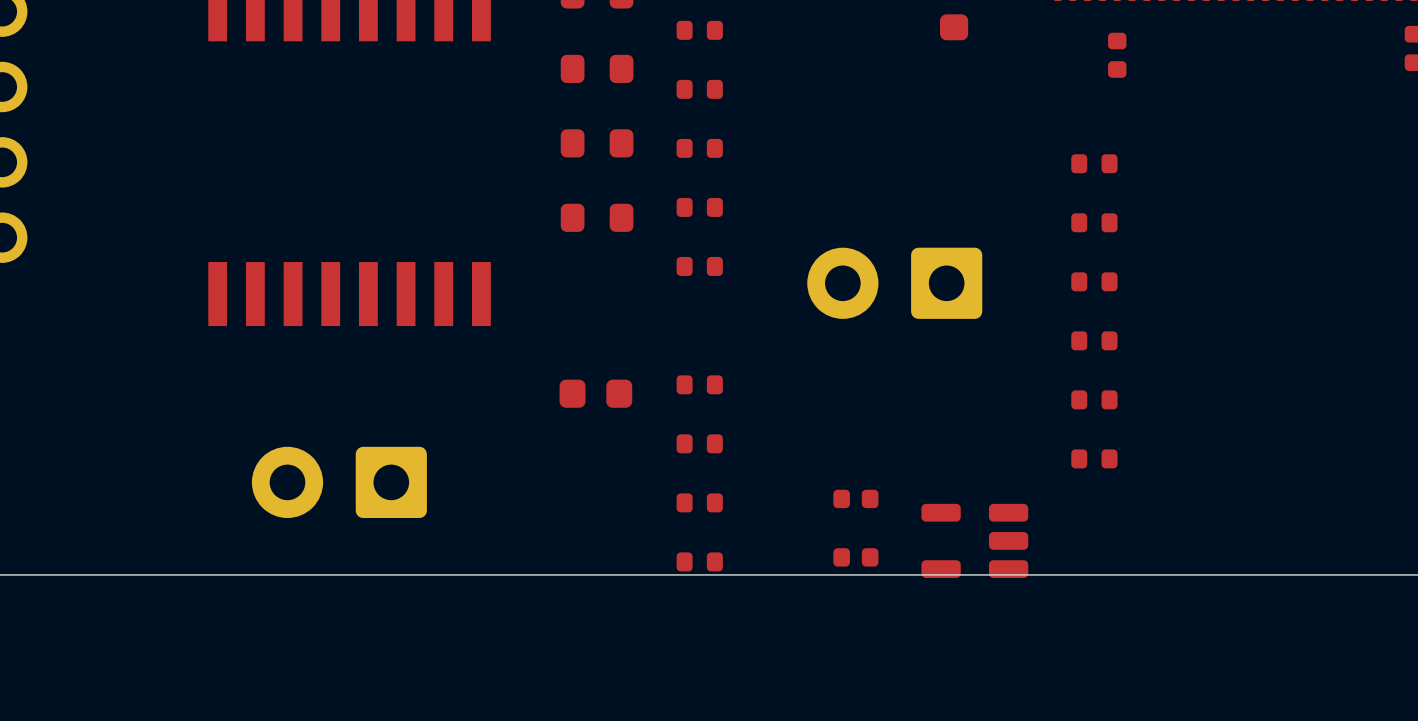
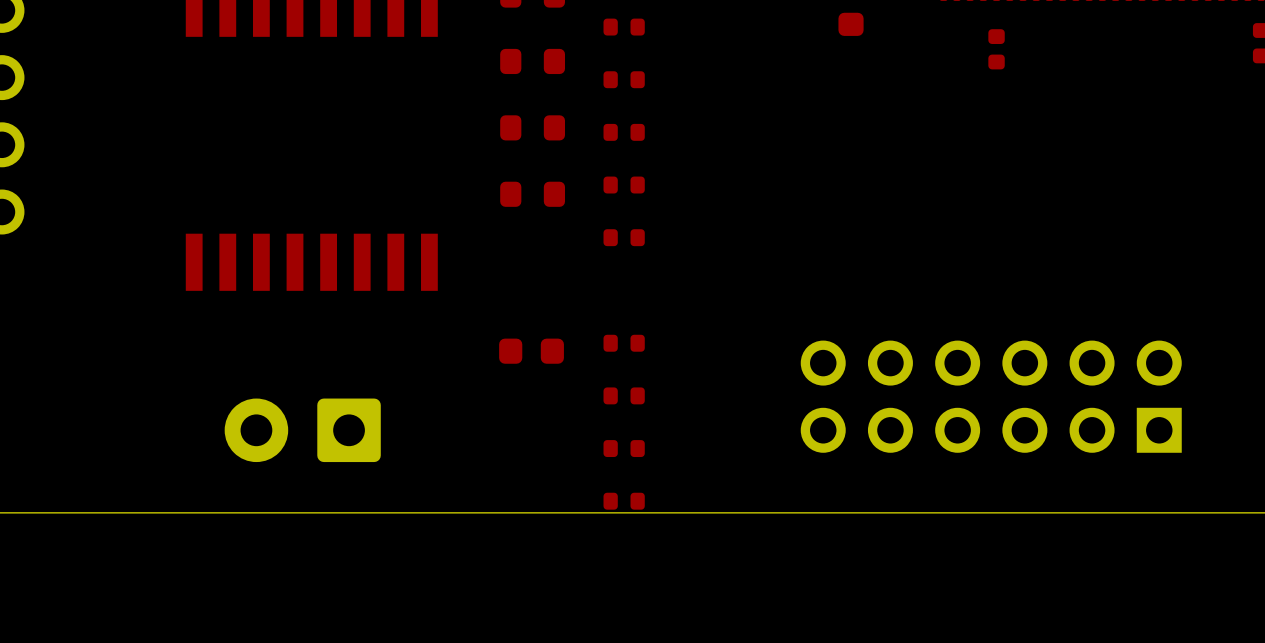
part: (1094, 163) -> none
part: (1094, 222) -> none
part: (1094, 281) -> none
part: (894, 283) -> none
part: (1094, 340) -> none
part: (1094, 399) -> none
part footprint: [1071, 449, 1118, 469] -> [800, 340, 1182, 453]
part: (855, 498) -> none
part: (974, 540) -> none
part: (855, 557) -> none

